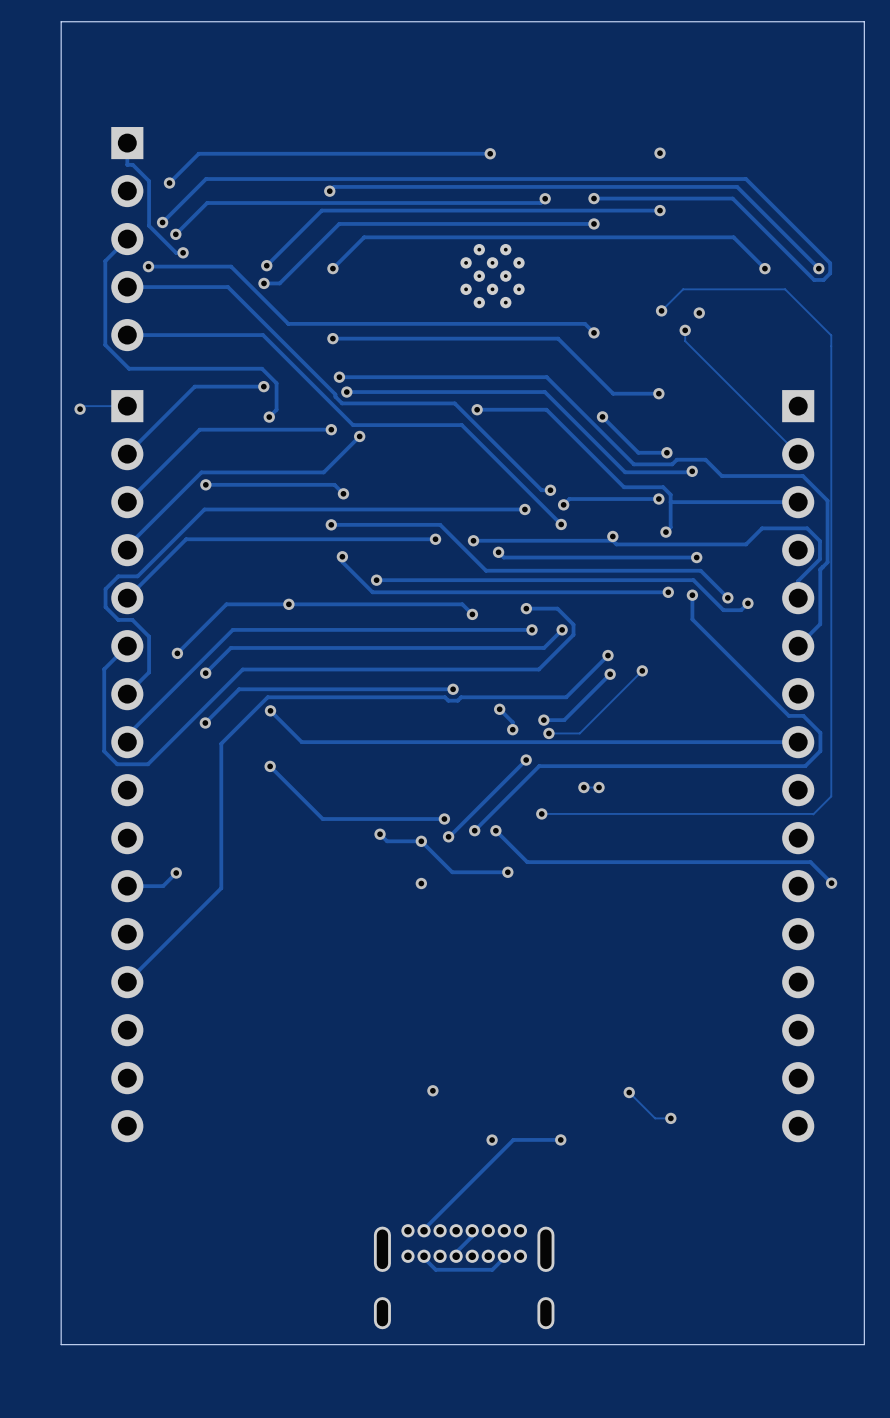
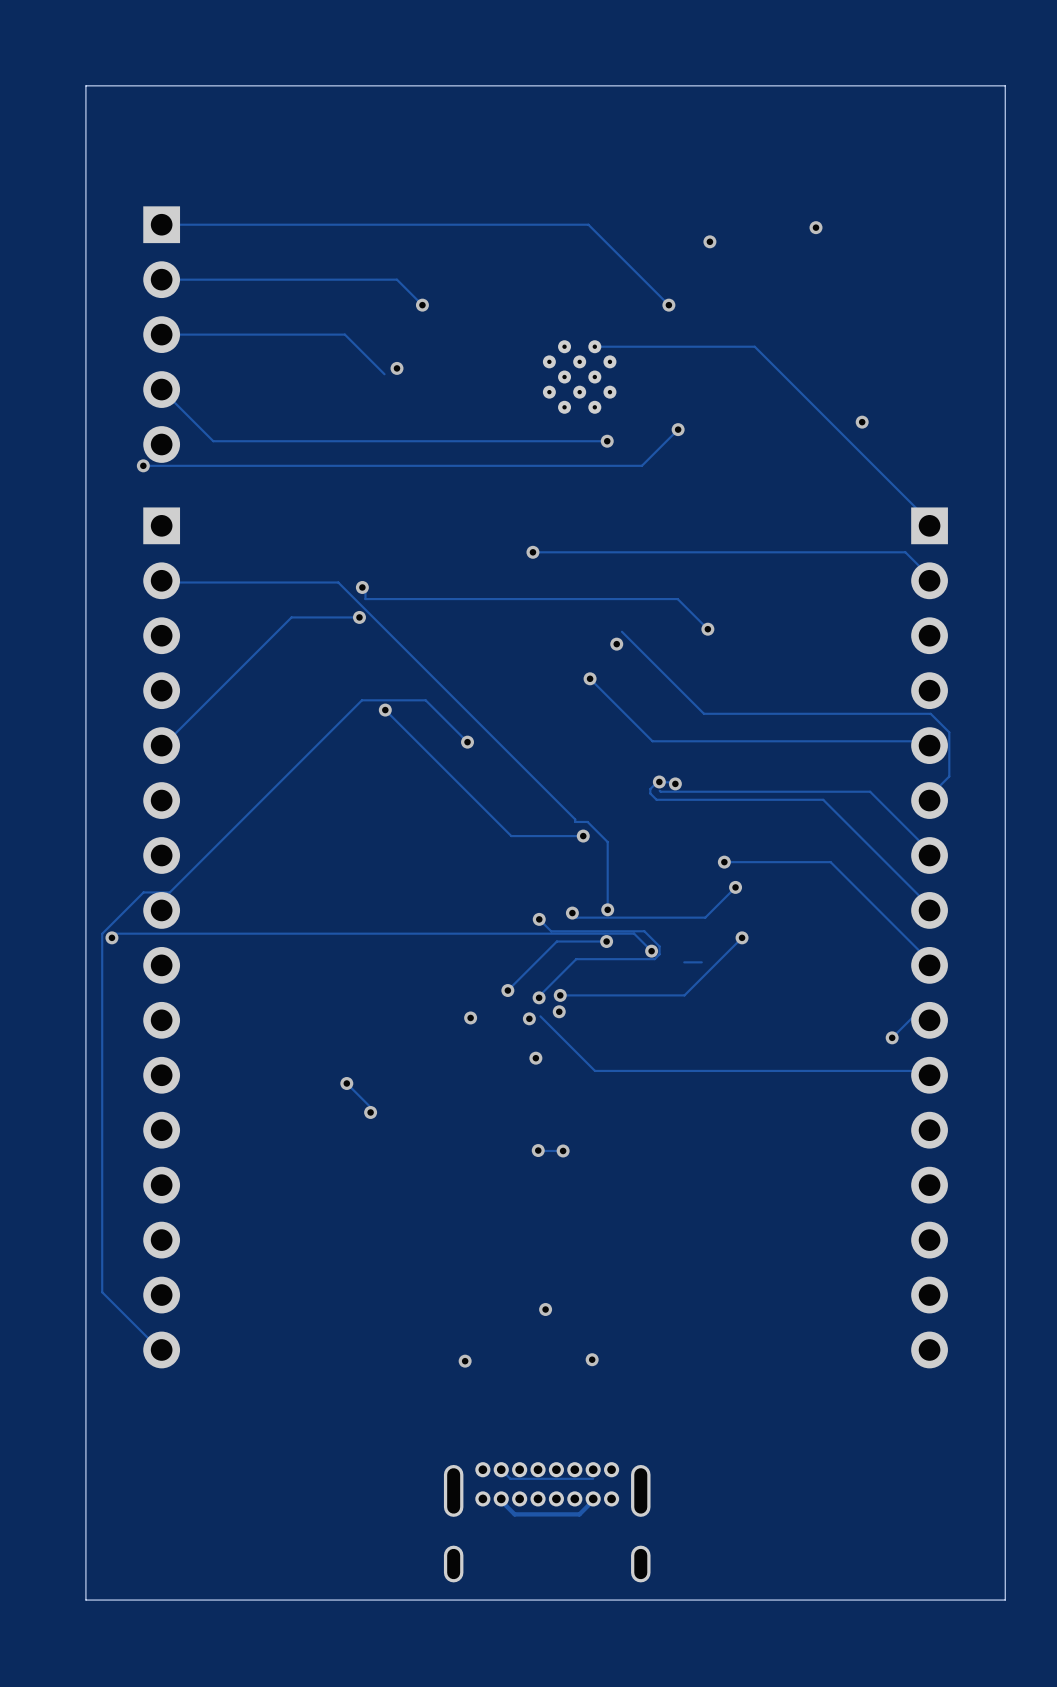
track: (127, 143) (127, 164) (132, 164) (149, 181) (149, 225) (176, 252) (183, 252) -> (161, 224) (588, 224) (668, 305)
via: none -> (816, 227)
track: (490, 153) (198, 153) (169, 183) -> none
via: (490, 153) -> none
via: (660, 153) -> none
via: none -> (709, 241)
via: (169, 183) -> none
track: none -> (161, 279) (396, 279) (422, 305)
track: (329, 191) (334, 186) (737, 186) (818, 268) -> none
via position: (329, 191) -> (422, 305)
track: (545, 198) (540, 203) (207, 203) (175, 234) -> none
via: (545, 198) -> none
track: (594, 198) (732, 198) (814, 279) (823, 279) (830, 273) (830, 263) (745, 179) (206, 179) (162, 222) -> none
via: (594, 198) -> none
track: (659, 210) (321, 210) (266, 265) -> none
via: (660, 210) -> none
via: none -> (668, 305)
via: (162, 222) -> none
track: (594, 223) (339, 223) (279, 283) (264, 283) -> none
via: (594, 223) -> none
via: (175, 234) -> none
track: (127, 239) (105, 261) (105, 345) (129, 368) (261, 368) (276, 383) (276, 409) (269, 417) -> (161, 334) (344, 334) (384, 374)
track: none -> (594, 346) (754, 346) (929, 521)
via: (183, 252) -> none
via: (266, 265) -> none
track: (148, 266) (231, 266) (288, 323) (585, 323) (594, 332) -> none
via: (148, 266) -> none
track: (764, 268) (733, 237) (364, 237) (332, 268) -> none
via: (764, 268) -> none
via: (818, 268) -> none
via: (264, 283) -> none
track: (127, 287) (227, 287) (342, 403) (454, 403) (541, 490) (550, 490) -> (161, 389) (213, 441) (607, 441)
track: (661, 310) (683, 289) (785, 289) (831, 335) (831, 796) (813, 814) (541, 813) -> none
via: (661, 310) -> none
via: (699, 313) -> none
via: none -> (862, 422)
track: none -> (678, 429) (641, 465) (143, 465)
track: (685, 330) (685, 341) (798, 454) -> none
via: (685, 330) -> none
via: none -> (607, 441)
via position: (594, 332) -> (678, 429)
track: (127, 335) (263, 335) (353, 425) (461, 425) (561, 524) -> none
track: (332, 338) (558, 338) (613, 393) (658, 393) -> none
via: (332, 338) -> none
via: none -> (143, 465)
track: (339, 377) (546, 377) (633, 464) (672, 464) (676, 459) (705, 459) (721, 476) (802, 476) (827, 500) (827, 562) (820, 569) (820, 624) (798, 646) -> none
via: (339, 377) -> none
track: (263, 386) (194, 386) (127, 454) -> none
via: (263, 386) -> none
track: (346, 392) (544, 392) (625, 472) (692, 471) -> none
via: (346, 392) -> none
via: (658, 393) -> none
track: (127, 406) (83, 406) (80, 409) -> none
via: (80, 409) -> none
track: (477, 409) (546, 409) (624, 487) (663, 487) (670, 494) (670, 527) (665, 532) -> none
via position: (477, 409) -> (532, 552)
track: (602, 416) (638, 452) (666, 452) -> none
via: (602, 416) -> none
via: (269, 417) -> none
track: (331, 429) (199, 429) (127, 502) -> none
via: (331, 429) -> none
track: none -> (532, 552) (905, 552) (929, 576)
track: (359, 436) (323, 472) (201, 472) (127, 546) (127, 550) -> none
via: (359, 436) -> none
via: (666, 452) -> none
track: none -> (161, 582) (338, 582) (575, 819) (575, 821) (587, 821) (607, 842) (607, 909)
track: none -> (362, 587) (365, 590) (365, 599) (677, 599) (707, 629)
via: none -> (362, 587)
via: (692, 471) -> none
track: (205, 484) (334, 484) (343, 493) -> none
via: (205, 484) -> none
track: none -> (359, 617) (291, 617) (161, 747)
via: none -> (359, 617)
via: (550, 490) -> none
via: (343, 493) -> none
via: none -> (707, 629)
track: none -> (621, 631) (703, 713) (930, 713) (949, 732) (949, 776) (929, 796)
track: (658, 499) (569, 499) (563, 504) -> none
via: (658, 499) -> none
track: (798, 502) (670, 502) -> none
via: (563, 504) -> none
track: (524, 509) (204, 509) (137, 576) (118, 576) (105, 589) (105, 607) (118, 619) (132, 619) (149, 636) (149, 672) (127, 694) -> none
track: (331, 524) (440, 524) (486, 570) (700, 570) (727, 597) -> none
via: (331, 524) -> none
via: (561, 524) -> none
via: (665, 532) -> none
via: (612, 536) -> none
track: (435, 539) (186, 539) (127, 598) -> none
via: (435, 539) -> none
track: none -> (590, 678) (652, 741) (929, 741)
via: (473, 540) -> none
track: (612, 540) (473, 540) -> none
track: (612, 540) (616, 544) (746, 544) (762, 528) (807, 528) (819, 541) (819, 559) (798, 580) (798, 598) -> none
track: (498, 552) (503, 557) (696, 557) -> none
via position: (498, 552) -> (590, 678)
track: (342, 556) (342, 562) (372, 592) (668, 592) -> none
via: (342, 556) -> none
via: (696, 557) -> none
track: none -> (385, 710) (511, 836) (583, 836)
via: none -> (385, 710)
track: (376, 580) (693, 580) (723, 610) (741, 610) (747, 603) -> none
via position: (376, 580) -> (467, 742)
via: (668, 592) -> none
track: none -> (467, 742) (425, 700) (361, 700) (169, 892) (143, 892) (102, 933) (102, 1292) (161, 1351)
track: (692, 595) (692, 619) (788, 715) (803, 715) (820, 732) (820, 751) (805, 766) (539, 766) (474, 830) -> none
via: (692, 595) -> none
via: (727, 597) -> none
via: (747, 603) -> none
via: (288, 604) -> none
track: (526, 608) (557, 608) (573, 624) (573, 634) (538, 669) (242, 669) (147, 764) (117, 764) (104, 751) (104, 669) (127, 646) -> none
via: (526, 608) -> none
track: (472, 614) (462, 604) (226, 604) (177, 653) -> none
via: (472, 614) -> none
track: (532, 629) (232, 629) (127, 735) (127, 742) -> none
via: (532, 629) -> none
track: (562, 629) (544, 647) (230, 647) (205, 673) -> none
track: none -> (675, 783) (673, 782) (657, 782) (650, 789) (650, 793) (656, 799) (823, 799) (929, 906)
via: none -> (675, 783)
track: none -> (659, 790) (870, 791) (929, 851)
via: (177, 653) -> none
track: (608, 655) (566, 697) (461, 697) (457, 700) (448, 700) (445, 697) (267, 697) (221, 743) (221, 888) (127, 982) -> none
via: (608, 655) -> none
track: (642, 670) (579, 733) (548, 733) -> none
via: (642, 670) -> none
via: (205, 673) -> none
track: (610, 674) (564, 720) (543, 720) -> none
via: (610, 674) -> none
via: none -> (583, 836)
track: (453, 689) (239, 689) (205, 723) -> none
via: (453, 689) -> none
track: none -> (724, 862) (830, 862) (929, 961)
via: none -> (724, 862)
track: (499, 709) (512, 722) (512, 729) -> none
via: (499, 709) -> none
track: (270, 710) (301, 742) (798, 742) -> none
via: (270, 710) -> none
via: (543, 720) -> none
track: none -> (735, 887) (705, 917) (576, 917) (572, 913)
via: none -> (735, 887)
via: (205, 723) -> none
via: (512, 729) -> none
via: (548, 733) -> none
via: none -> (607, 909)
via: none -> (572, 913)
track: none -> (539, 919) (551, 931) (644, 931) (659, 946) (659, 954) (654, 959) (576, 959) (539, 996)
via: none -> (539, 919)
track: (526, 760) (451, 834) (446, 834) -> none
via position: (526, 760) -> (606, 941)
track: none -> (111, 937) (116, 933) (634, 933) (651, 951)
via: none -> (111, 937)
track: (270, 766) (322, 819) (444, 819) -> none
via: (270, 766) -> none
track: none -> (742, 937) (684, 995) (560, 995)
via: none -> (742, 937)
track: none -> (606, 941) (556, 941) (507, 990)
via: none -> (651, 951)
via: (583, 787) -> none
via: (599, 787) -> none
via: none -> (507, 990)
via: (541, 813) -> none
via: none -> (560, 995)
via: none -> (539, 997)
via: (444, 819) -> none
track: (495, 830) (527, 862) (810, 862) (831, 883) -> none
via: (495, 830) -> none
track: (380, 834) (387, 841) (421, 841) (452, 872) (507, 872) -> none
via: (380, 834) -> none
track: none -> (540, 1016) (595, 1070) (929, 1070)
track: none -> (929, 1015) (914, 1015) (892, 1037)
via: none -> (470, 1017)
via: (421, 841) -> none
via: none -> (535, 1058)
via: (507, 872) -> none
track: (176, 873) (163, 886) (127, 886) -> none
via: (176, 873) -> none
via: (421, 883) -> none
via position: (831, 883) -> (892, 1037)
track: none -> (346, 1083) (370, 1107) (370, 1112)
via: none -> (346, 1083)
via: none -> (370, 1112)
track: none -> (538, 1150) (563, 1150)
via: none -> (538, 1150)
via: none -> (563, 1150)
via: (432, 1090) -> none
via: none -> (545, 1309)
track: (629, 1092) (655, 1118) (670, 1118) -> none
via: (629, 1092) -> none
via: (670, 1118) -> none
via: none -> (465, 1361)
track: (560, 1139) (513, 1139) (424, 1230) -> (593, 1478) (510, 1478) (501, 1469)
via: (560, 1139) -> none
via position: (492, 1140) -> (592, 1359)
track: (472, 1230) (472, 1236) (456, 1252) (456, 1256) -> none

